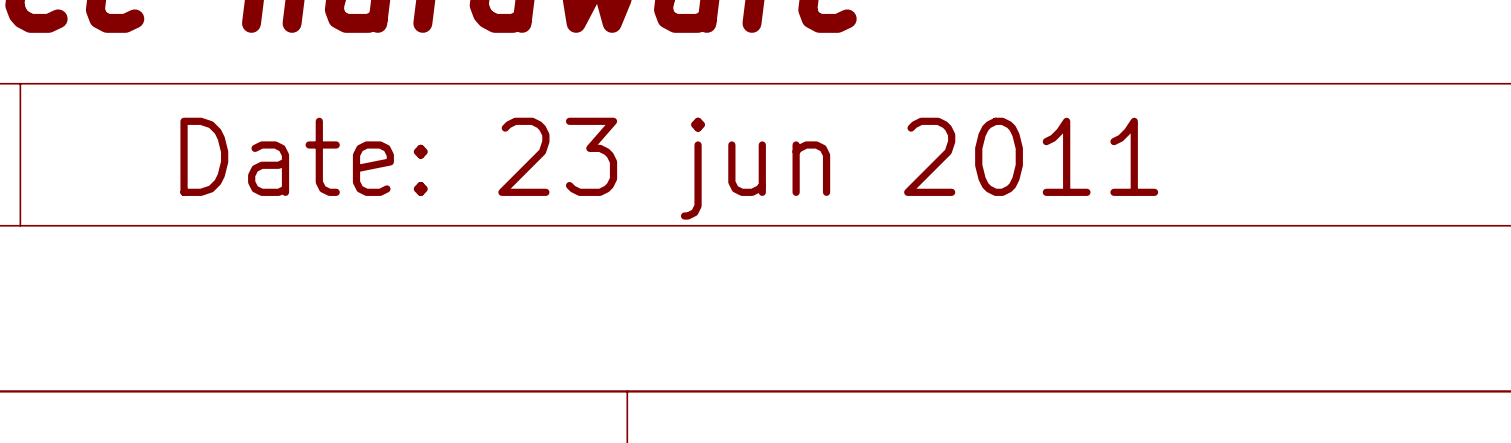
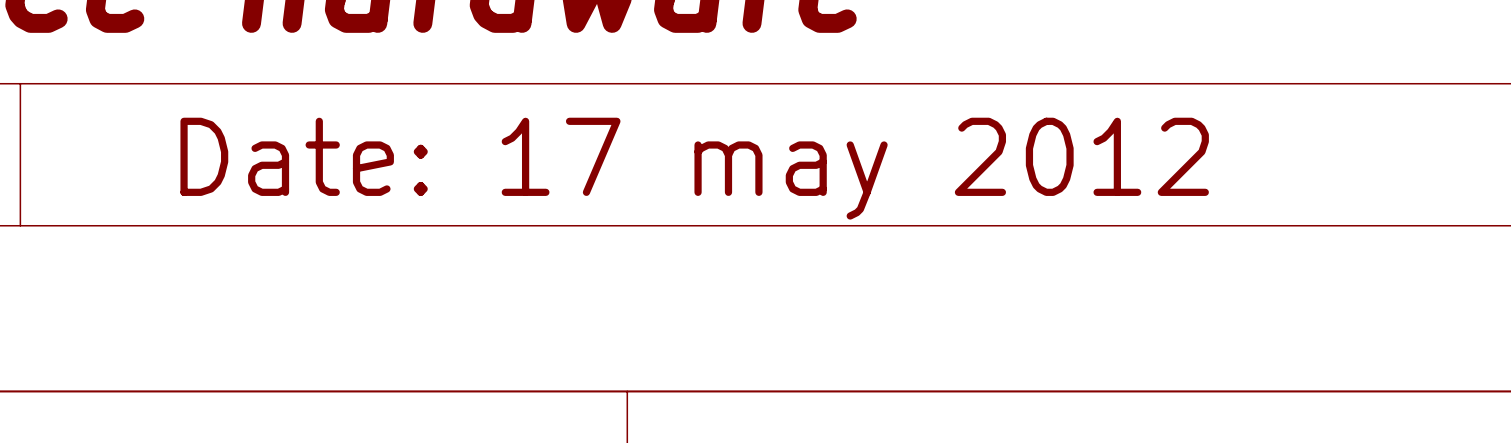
title block: Date: 23 jun 2011 (669, 168) -> Date: 17 may 2012 (694, 168)

